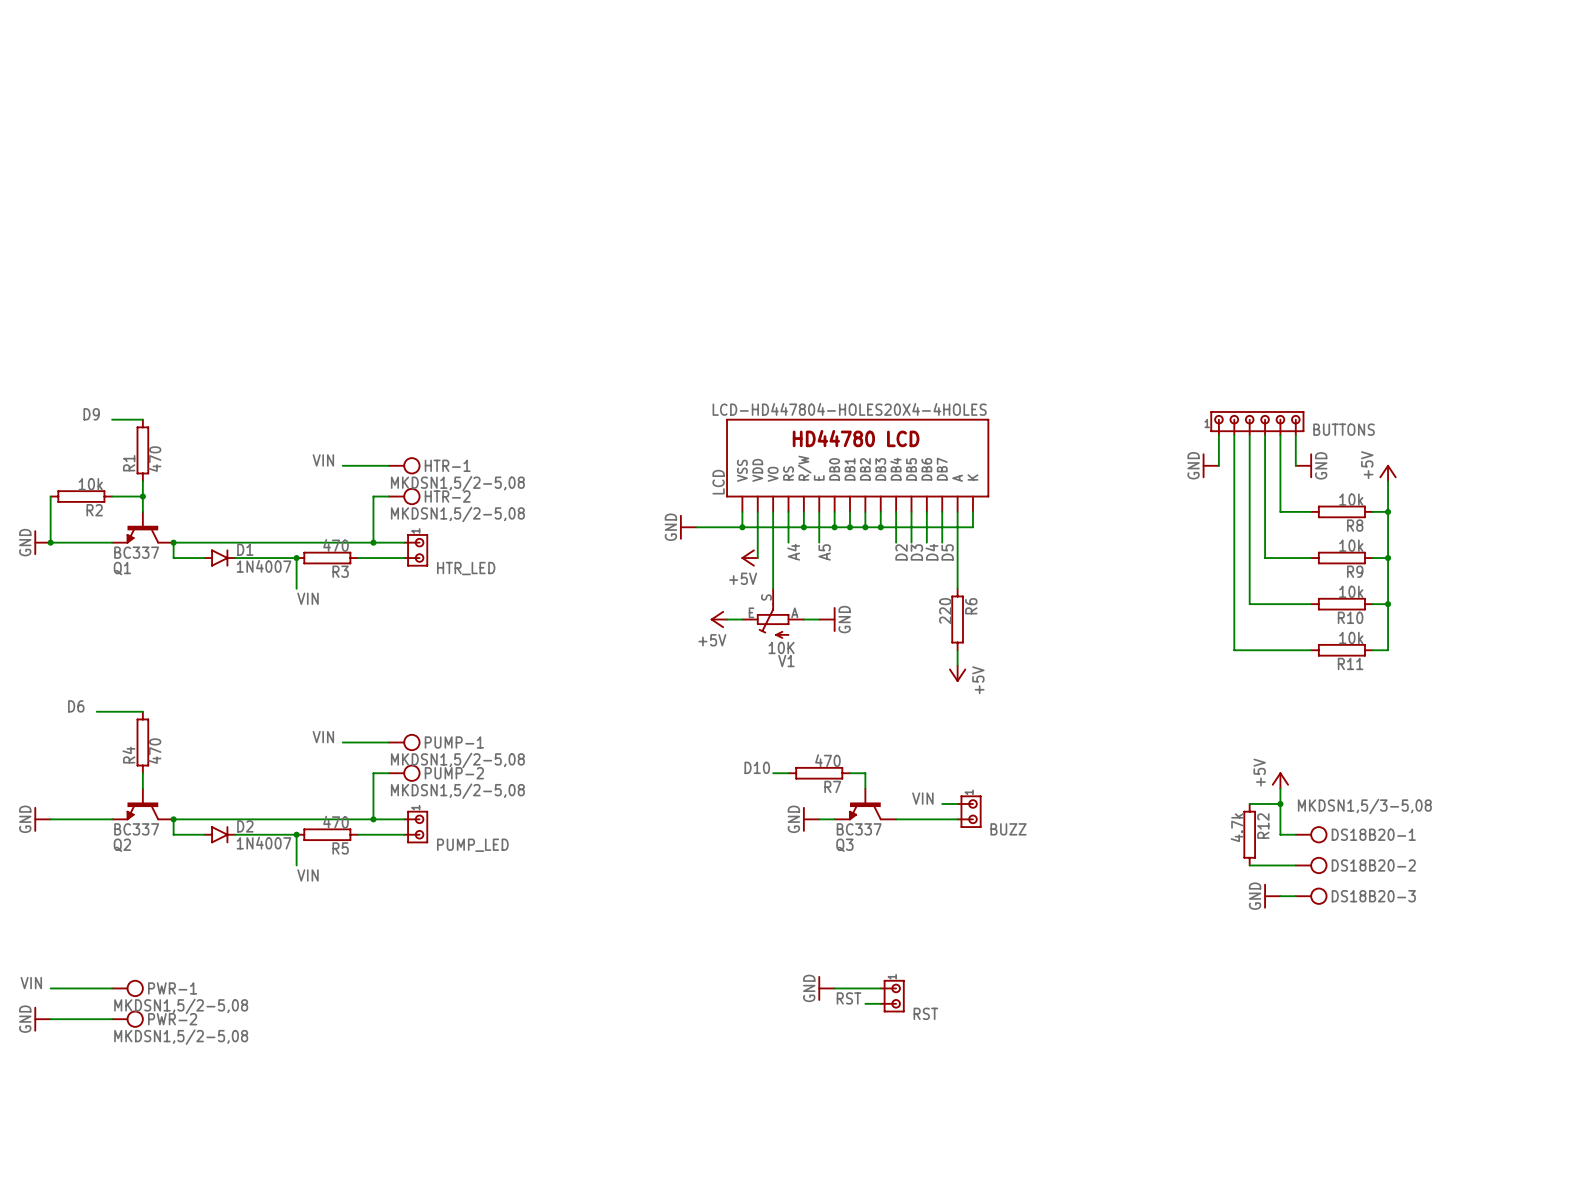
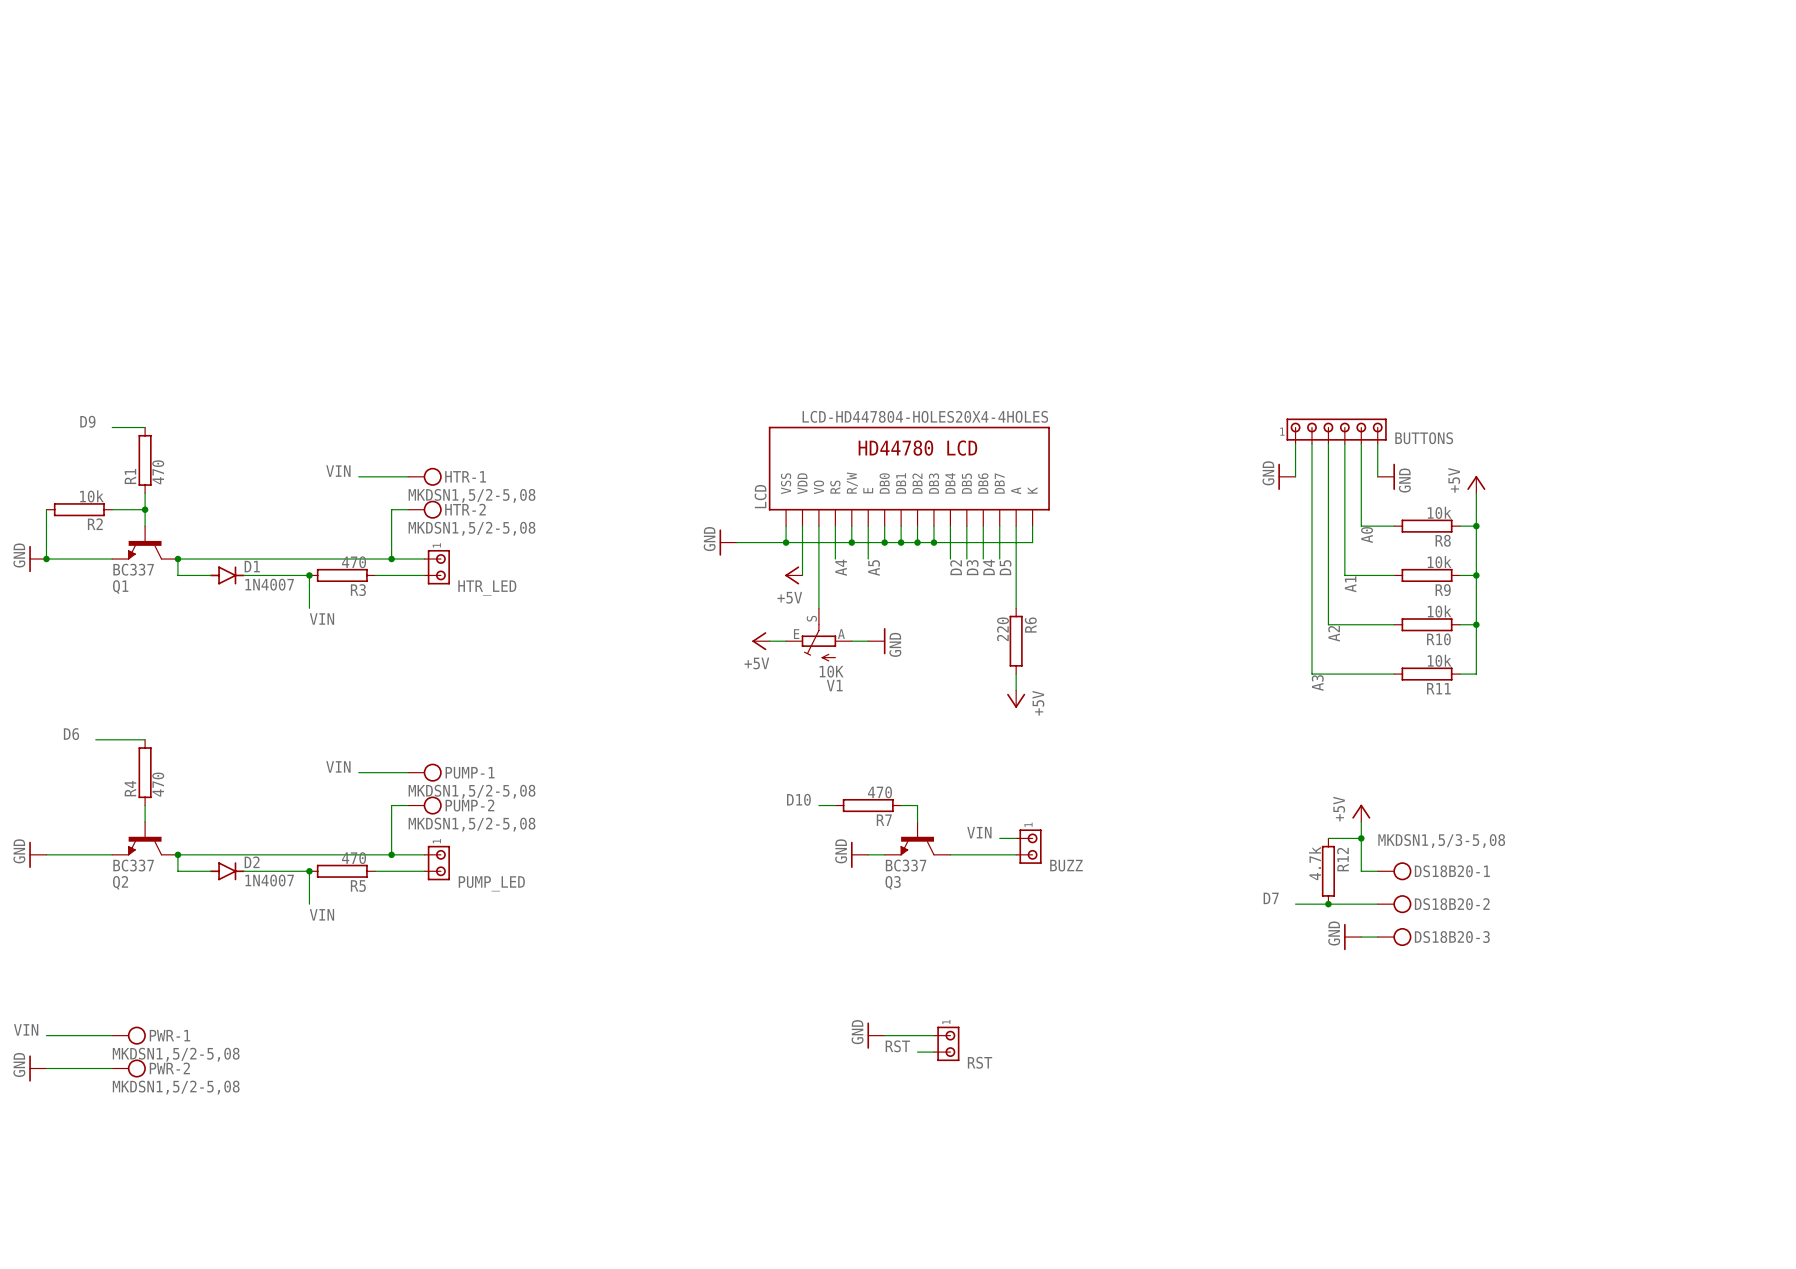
label: none -> A0 (1367, 535)
label: none -> A1 (1350, 584)
label: none -> A2 (1334, 633)
label: none -> A3 (1317, 683)
label: none -> D7 (1271, 898)
wire: none -> (1295, 904) (1328, 904)
junction: none -> (1328, 904)

